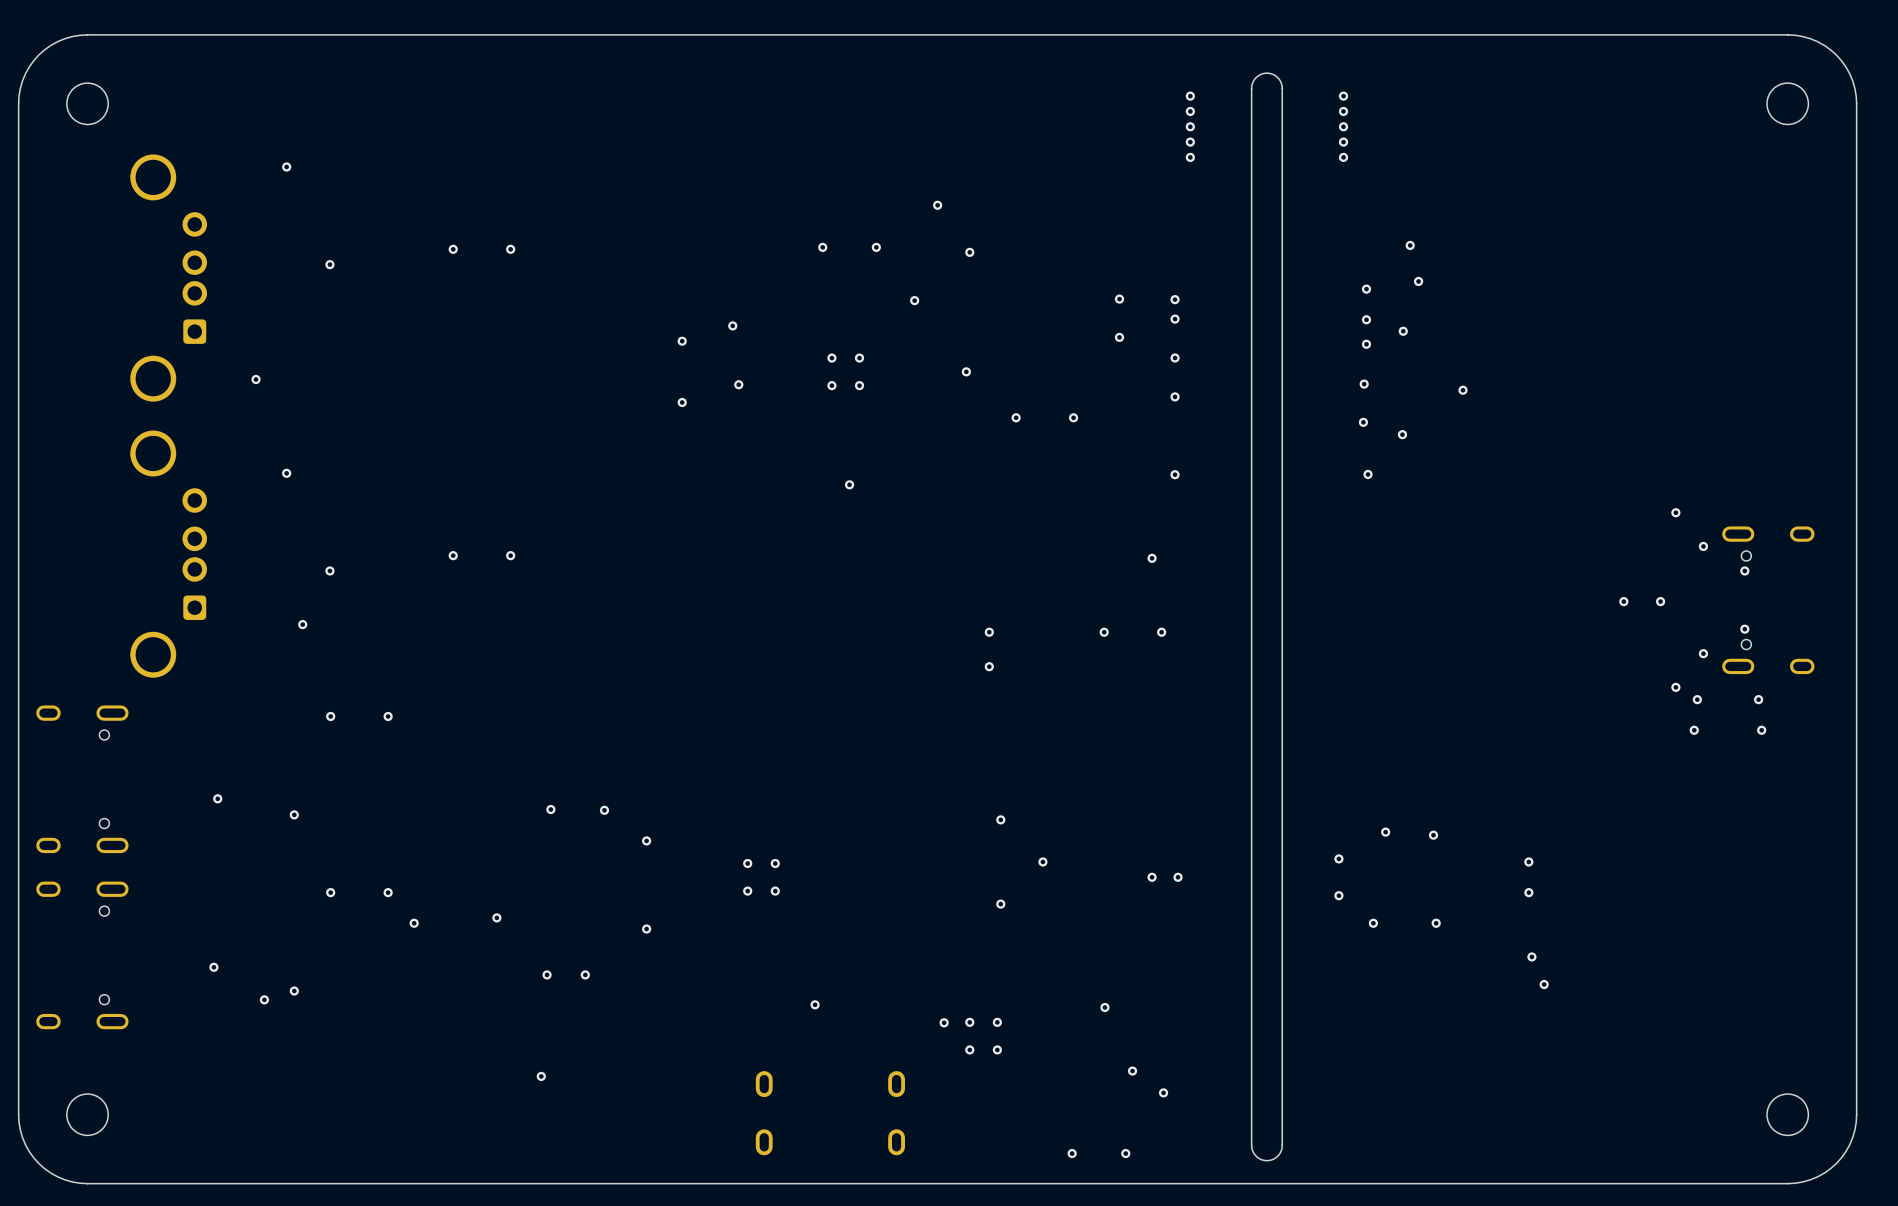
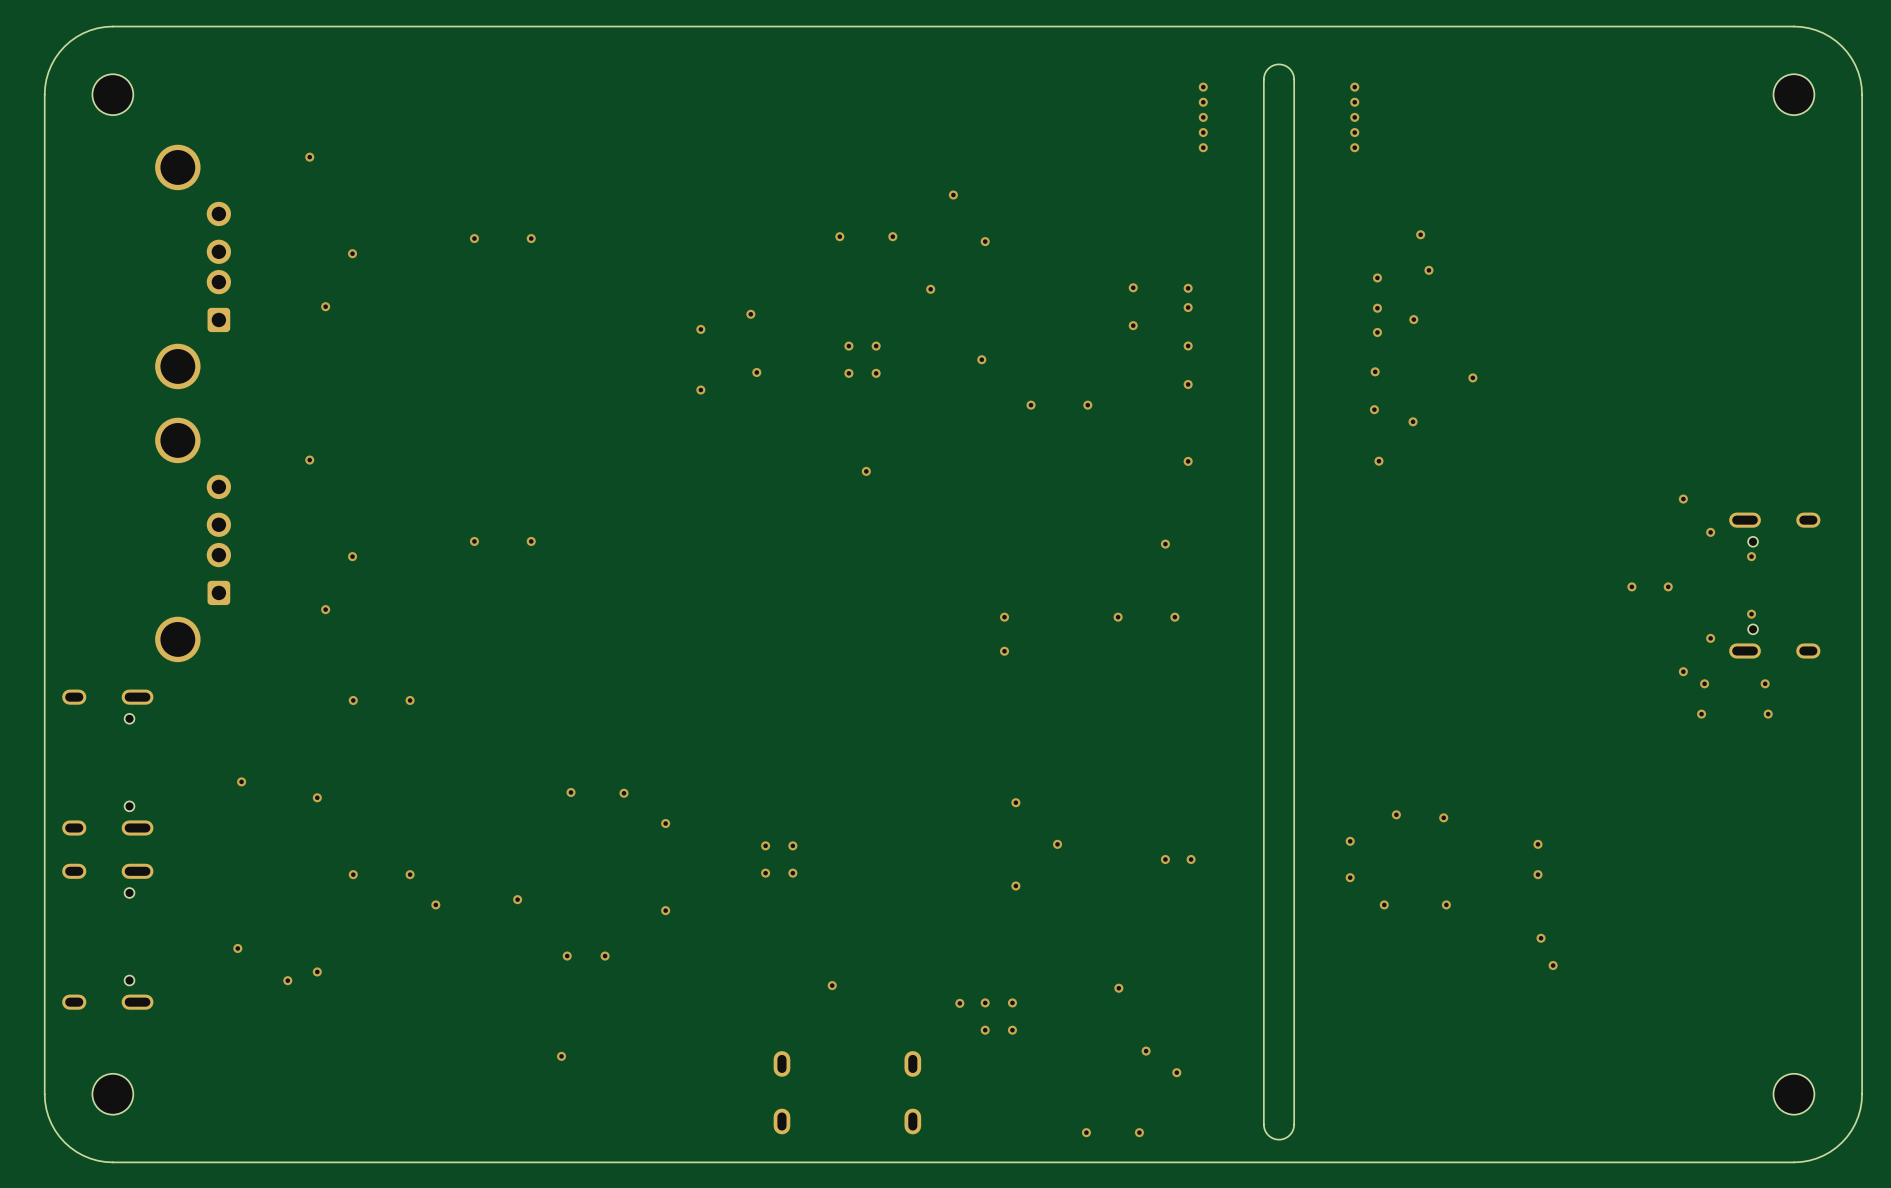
via position: (256, 379) -> (325, 306)

